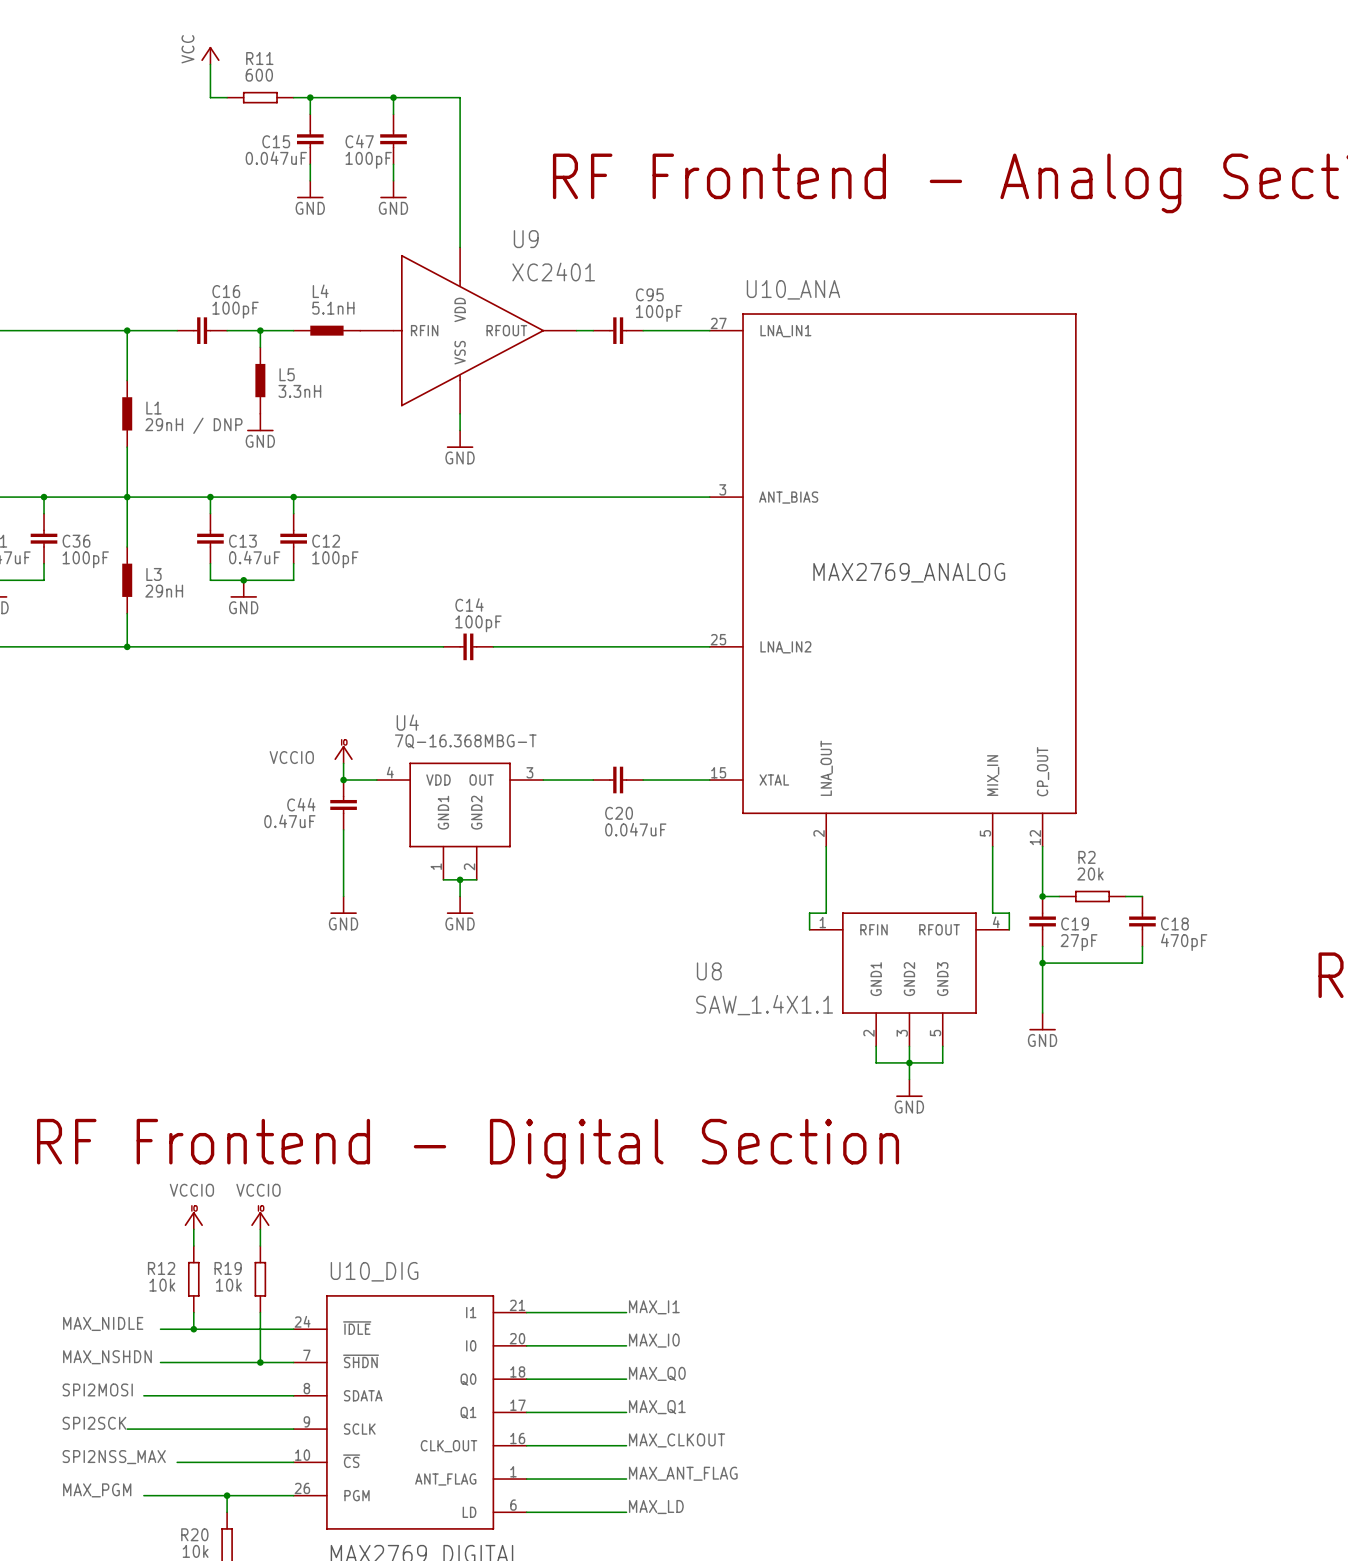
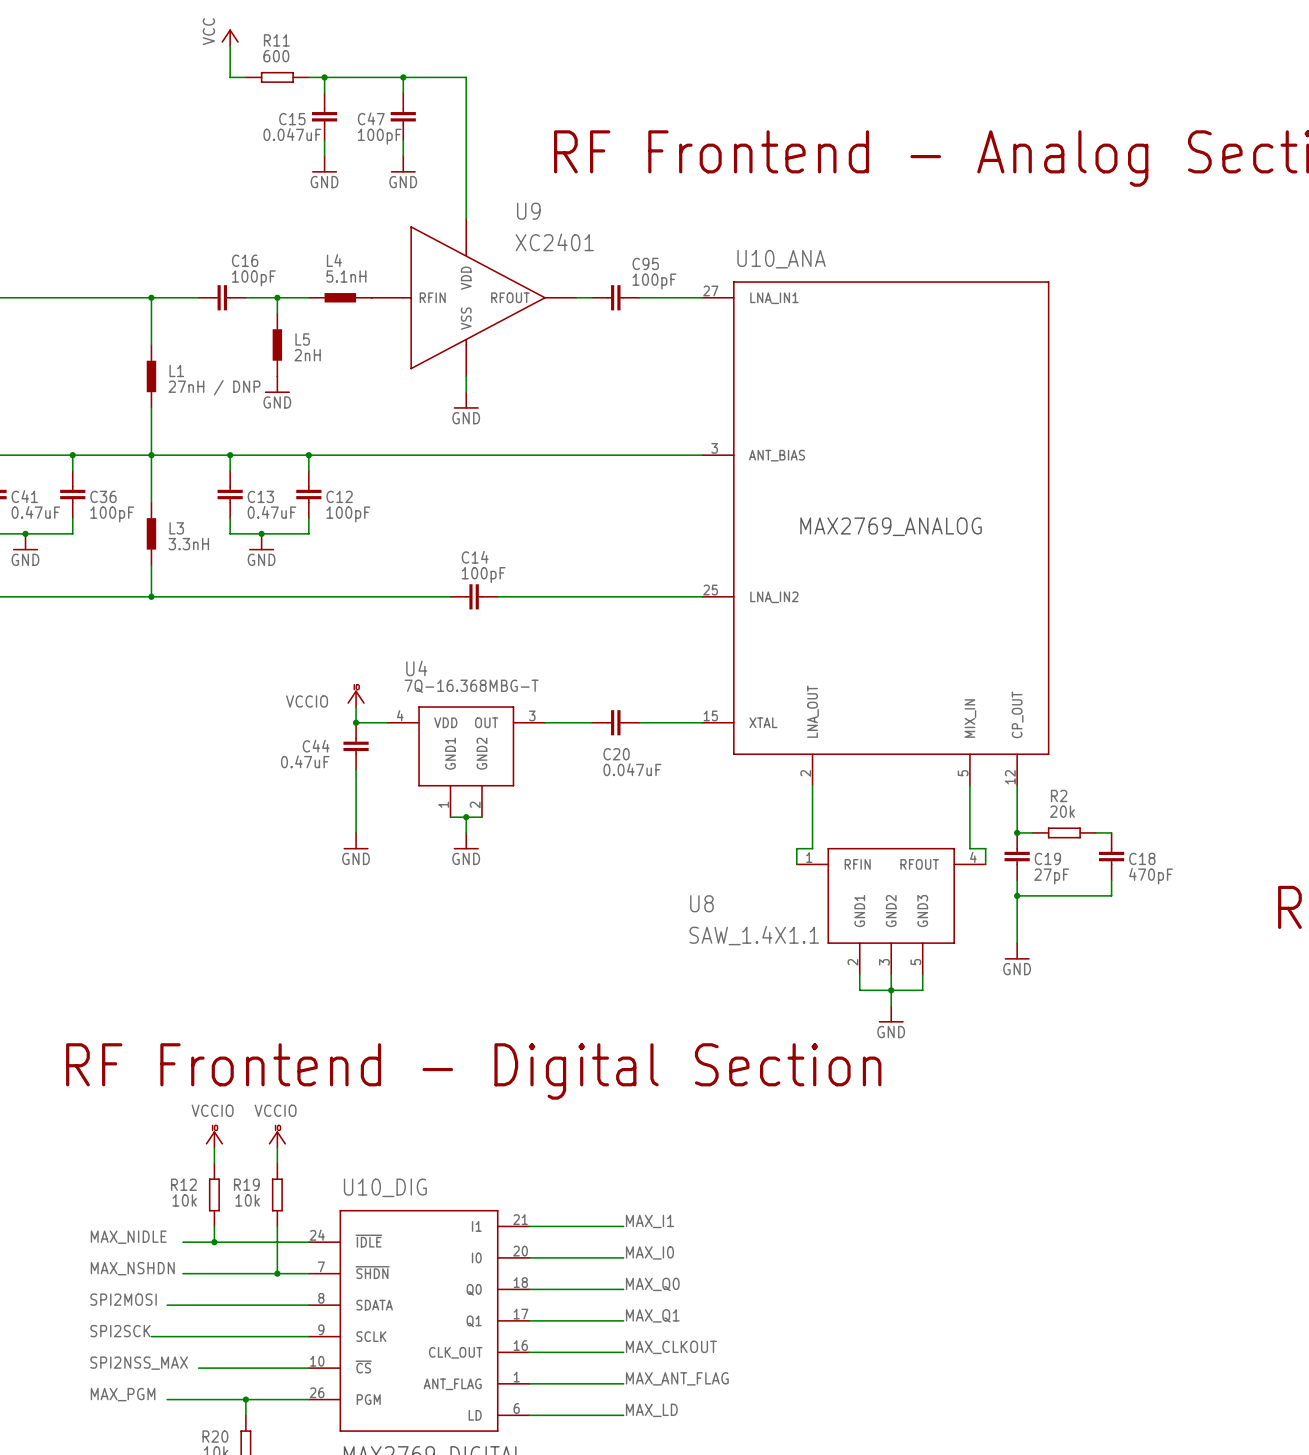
L5 value: 3.3nH (299, 391) -> 2nH (307, 355)
L1 value: 29nH / DNP (193, 425) -> 27nH / DNP (214, 387)
L3 value: 29nH (164, 591) -> 3.3nH (188, 544)

